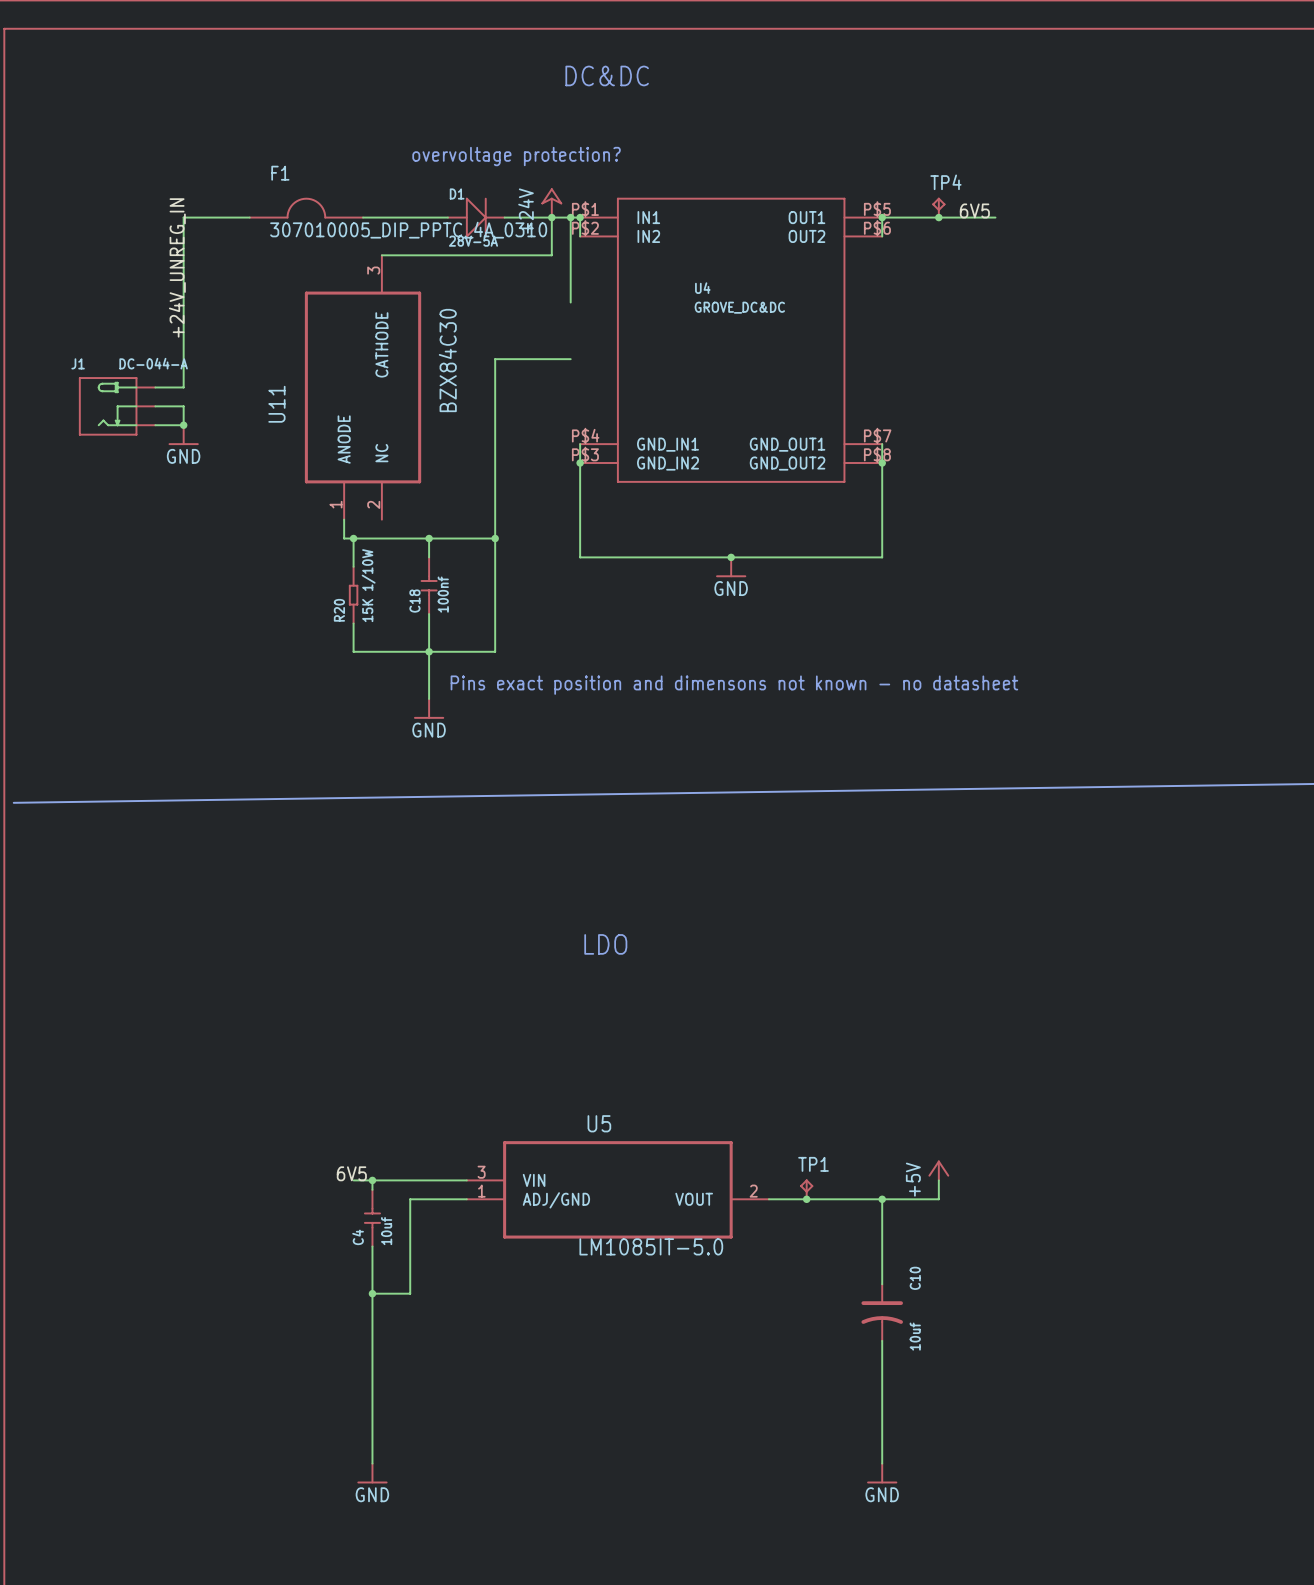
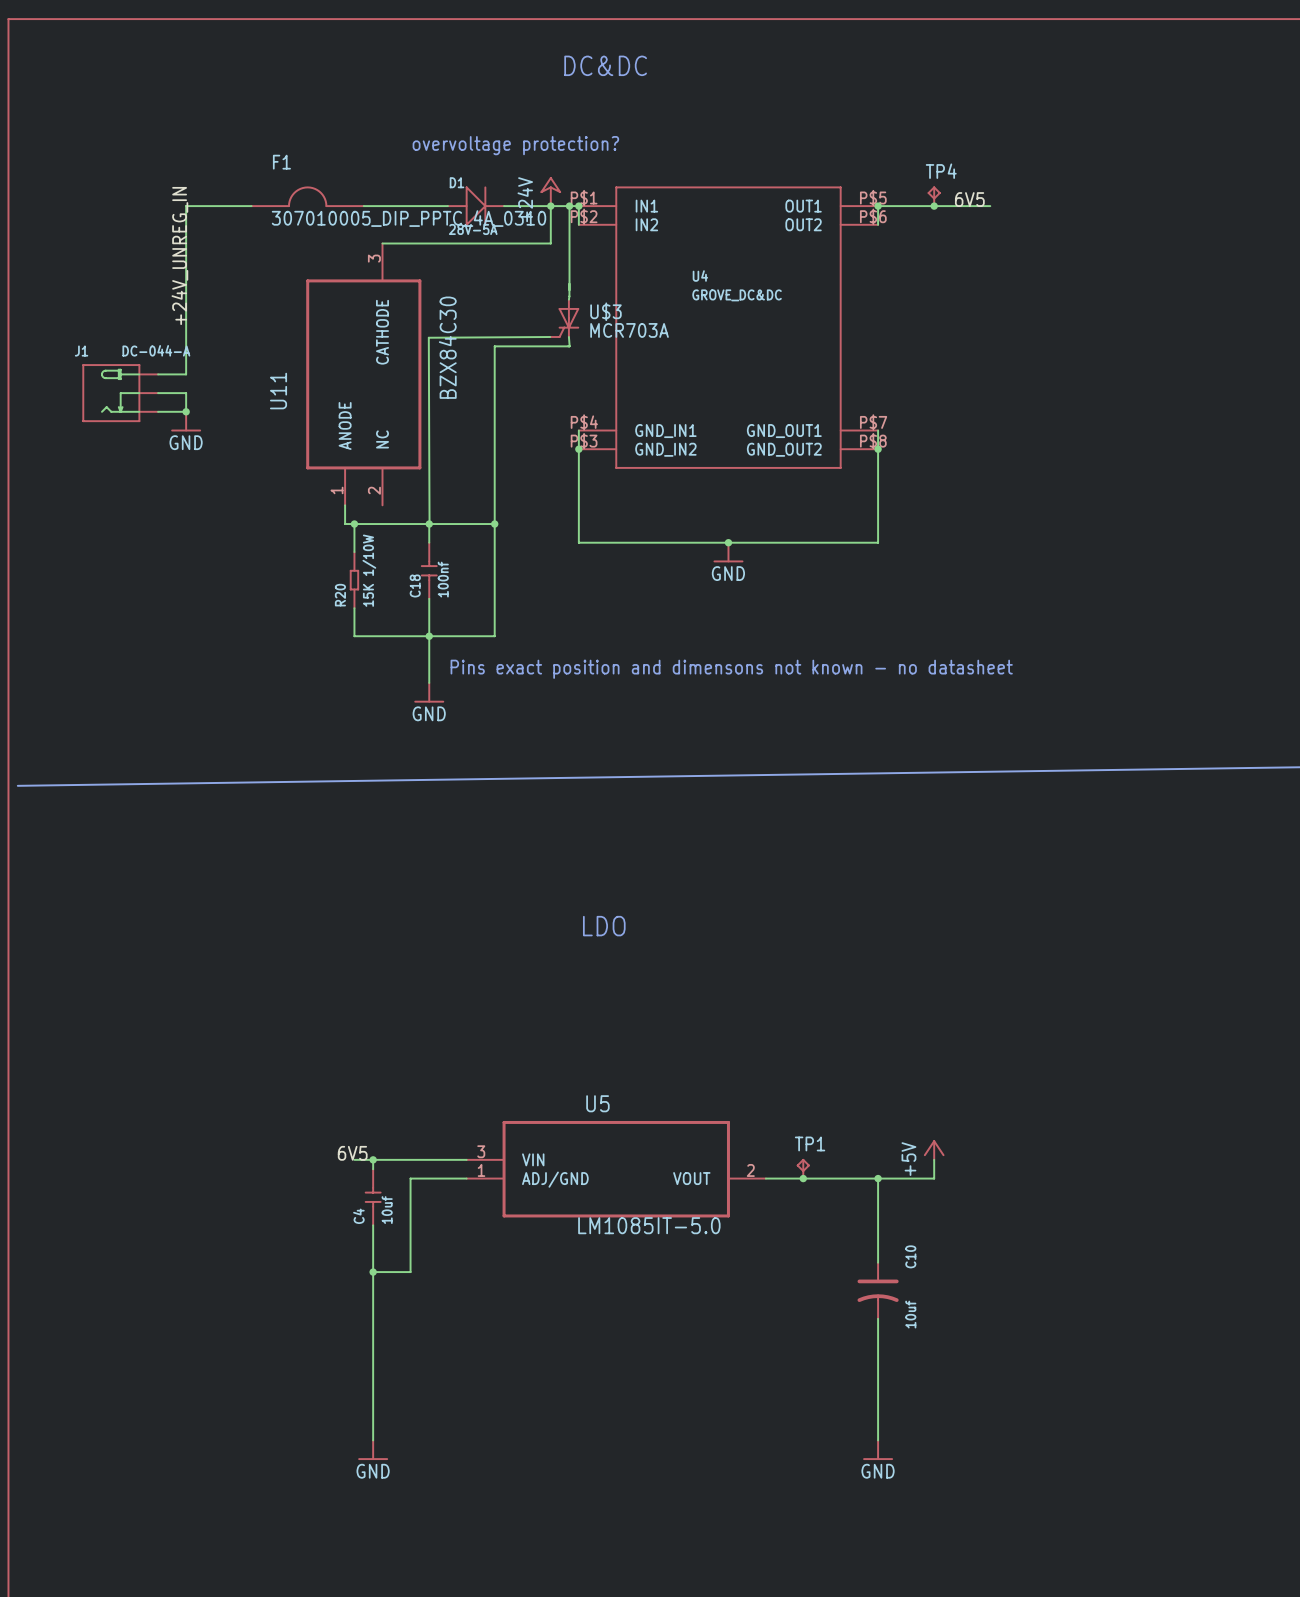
wire: none -> (569, 283) (568, 299)
U$3: none -> MCR703A (564, 318)
wire: none -> (550, 337) (428, 337) (429, 524)
wire: none -> (568, 337) (568, 346)

